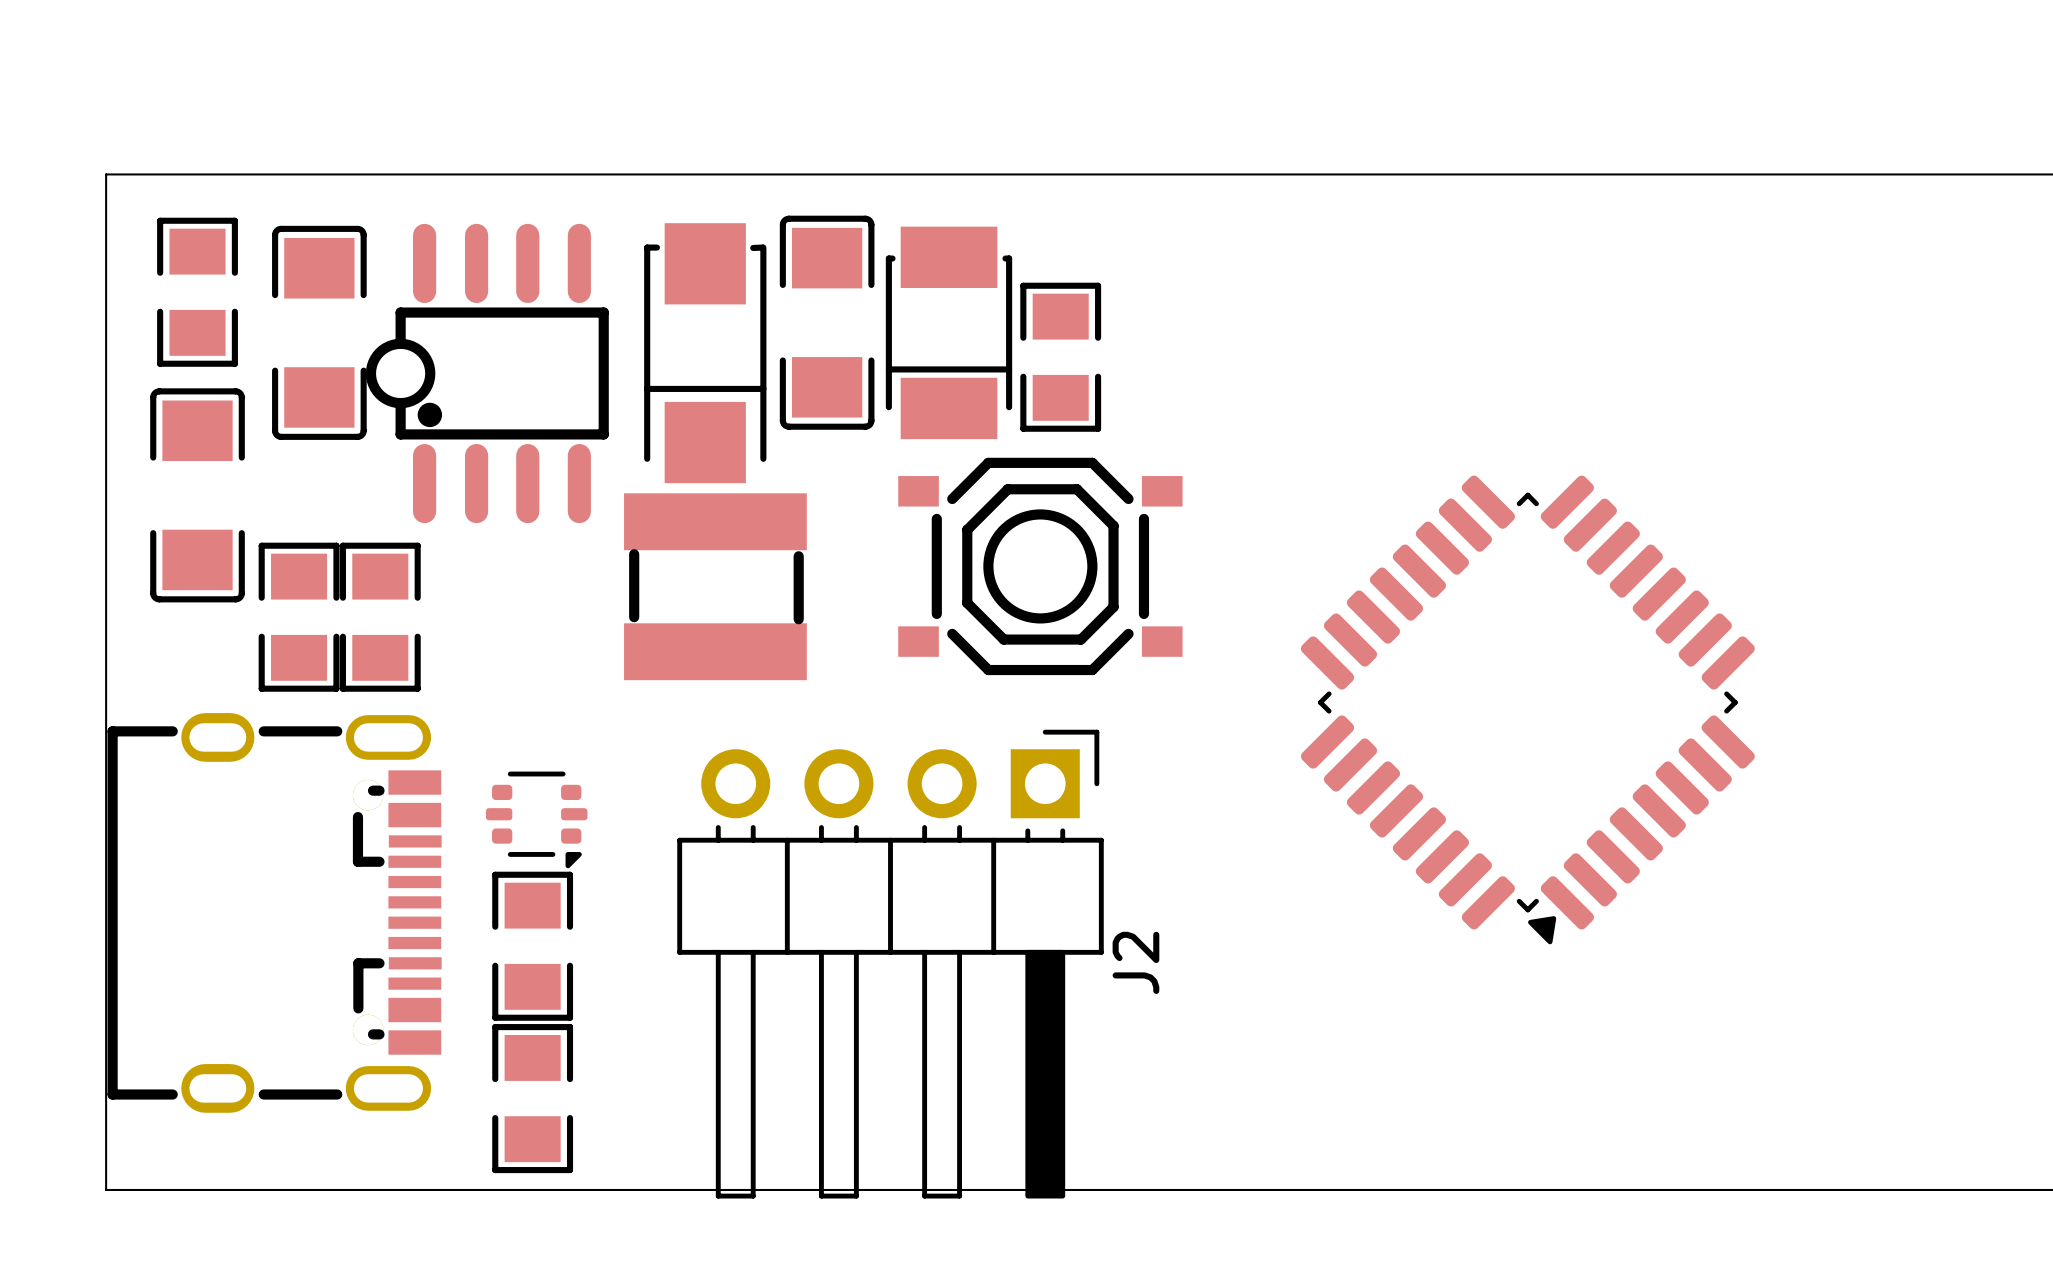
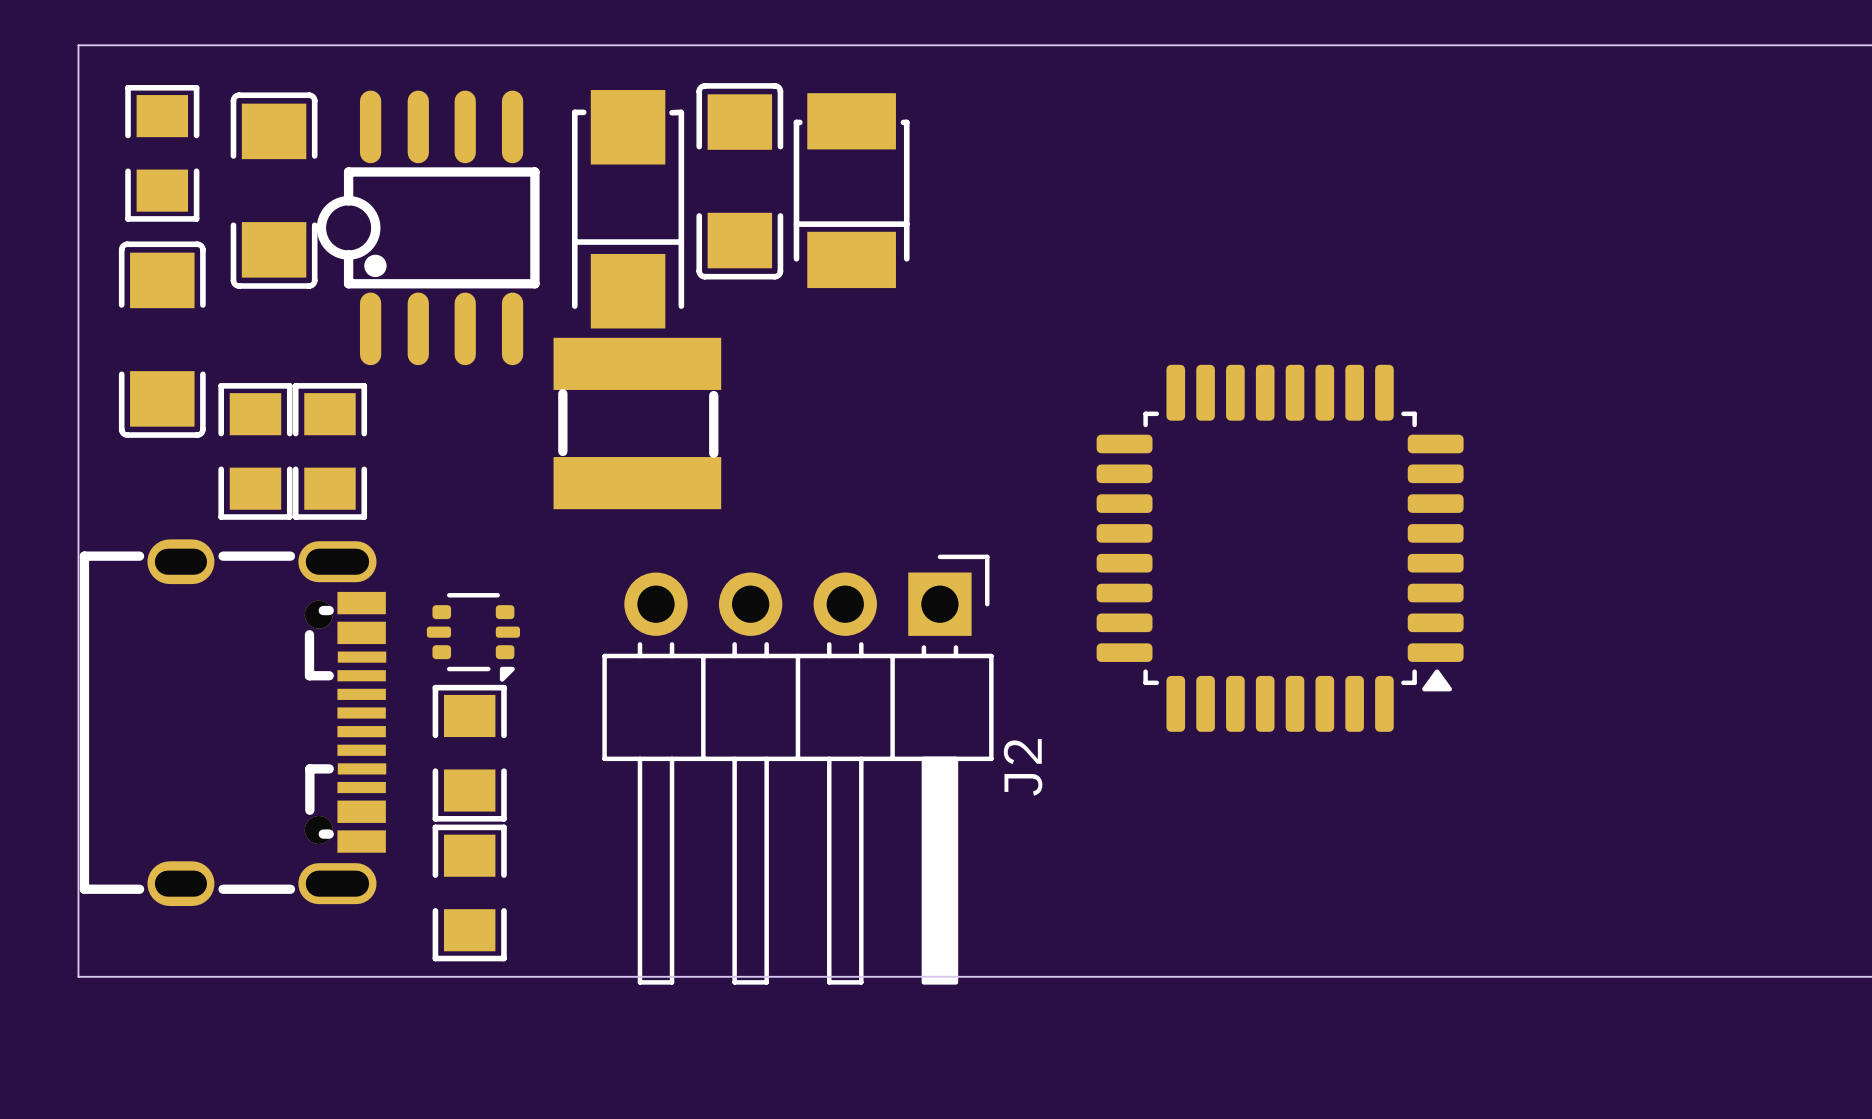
part: (1060, 357) -> none
part: (1040, 566) -> none
part: (1527, 709) -> none
part: none -> (1280, 548)

